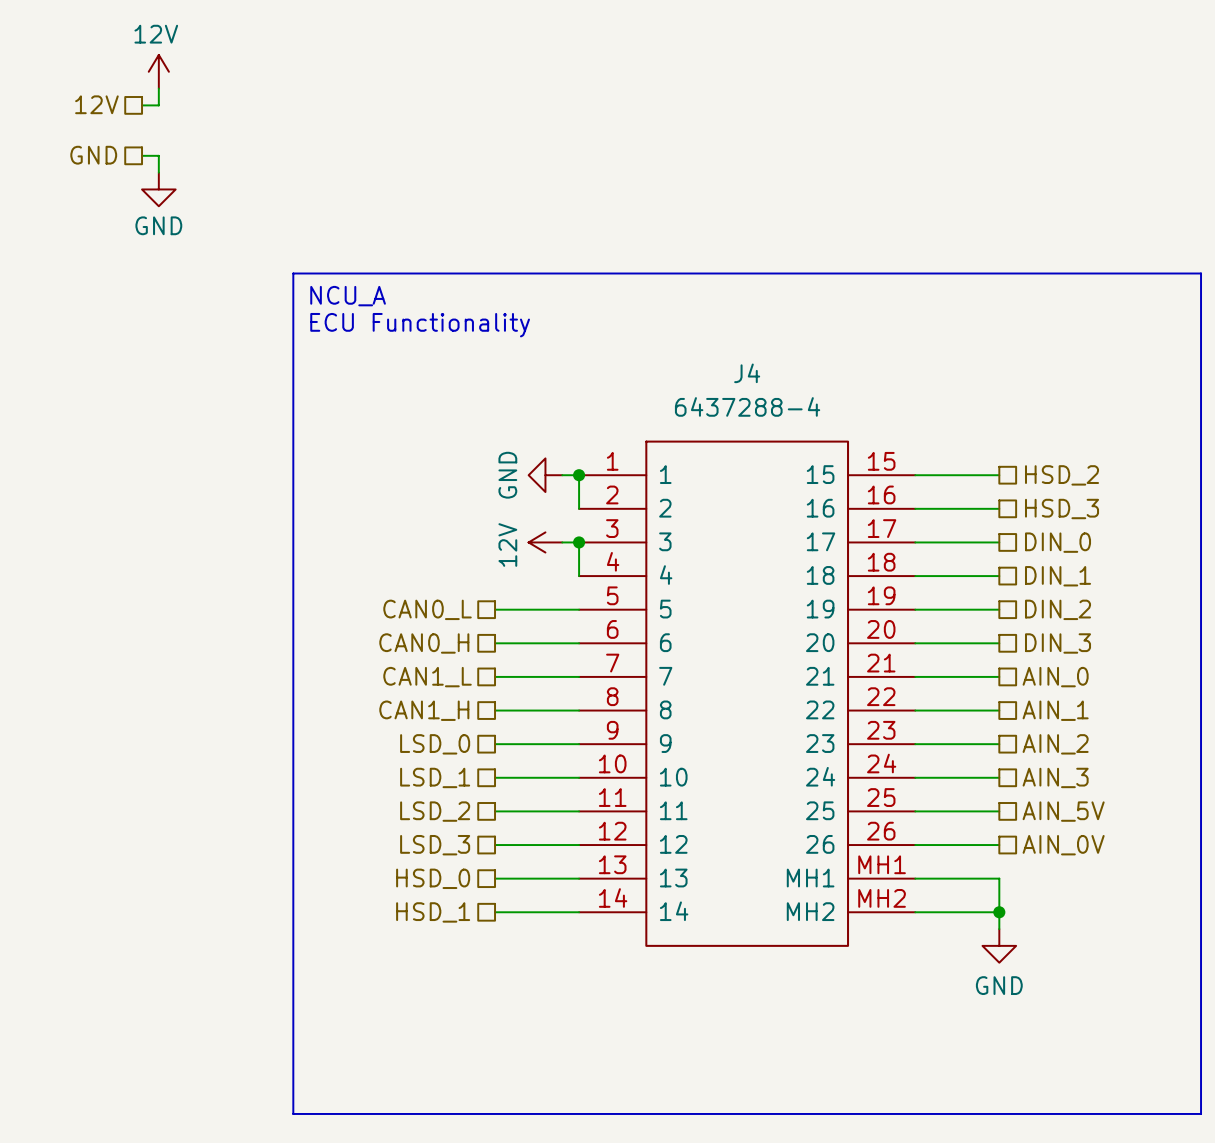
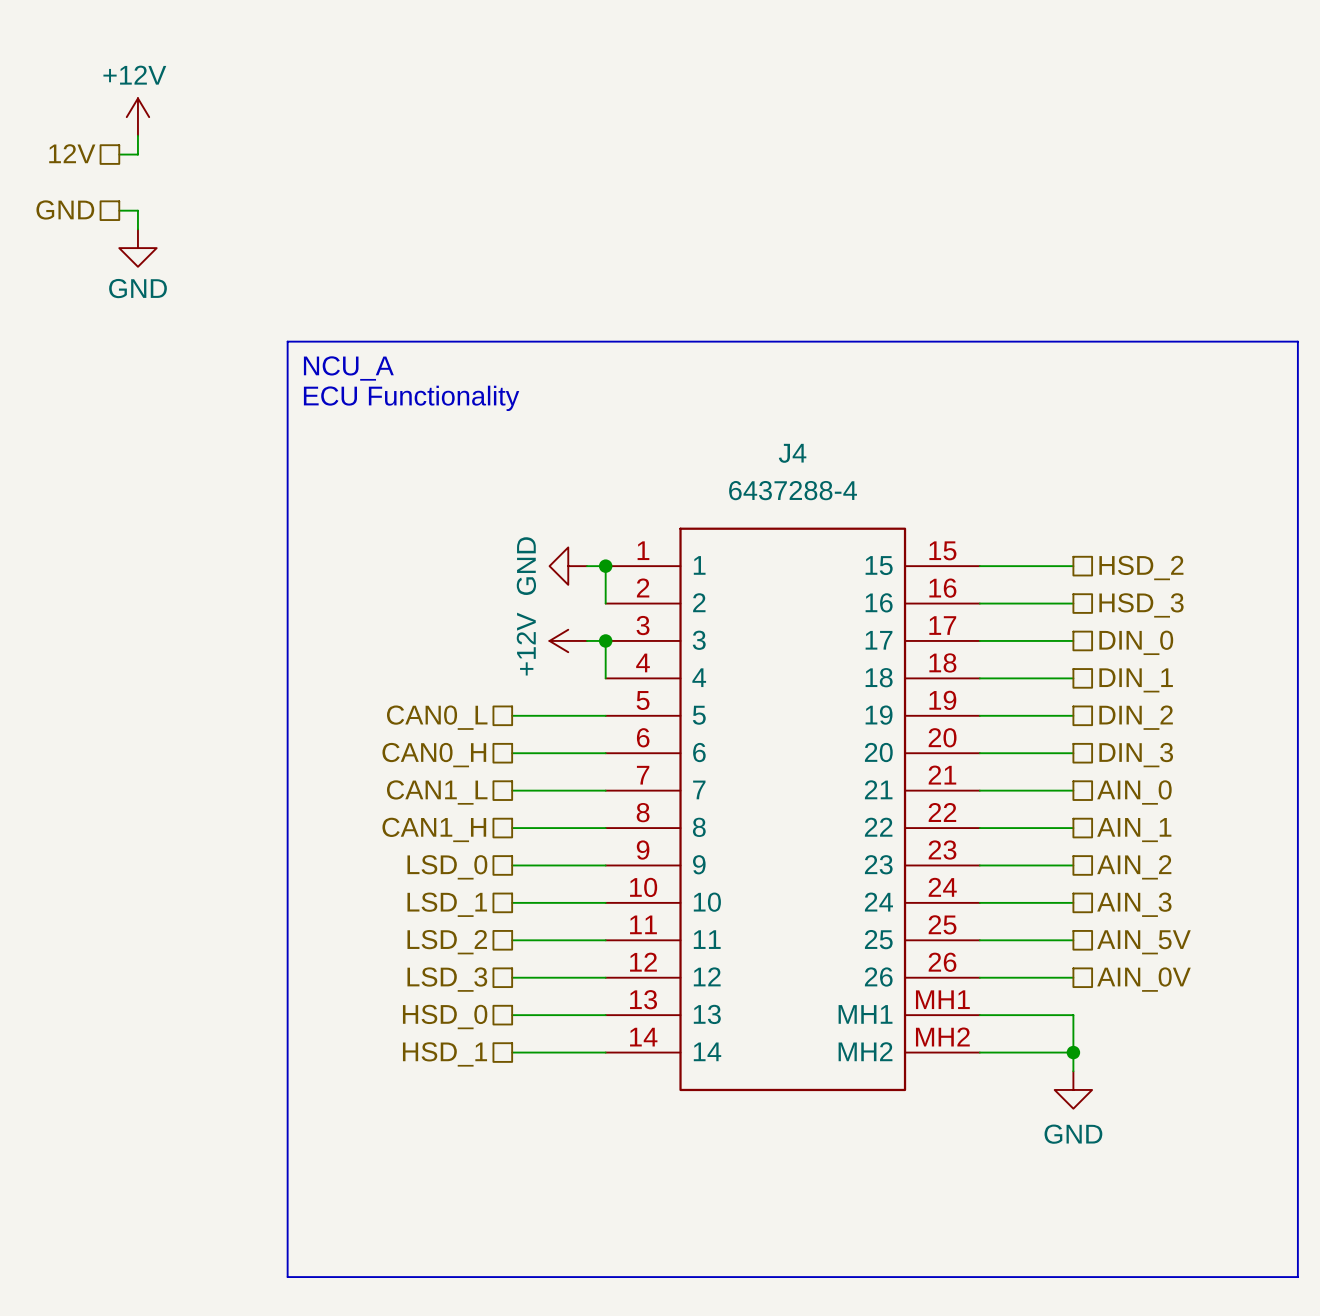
power symbol: 12V (158, 71) -> +12V (137, 117)
power symbol: 12V (545, 542) -> +12V (568, 640)

